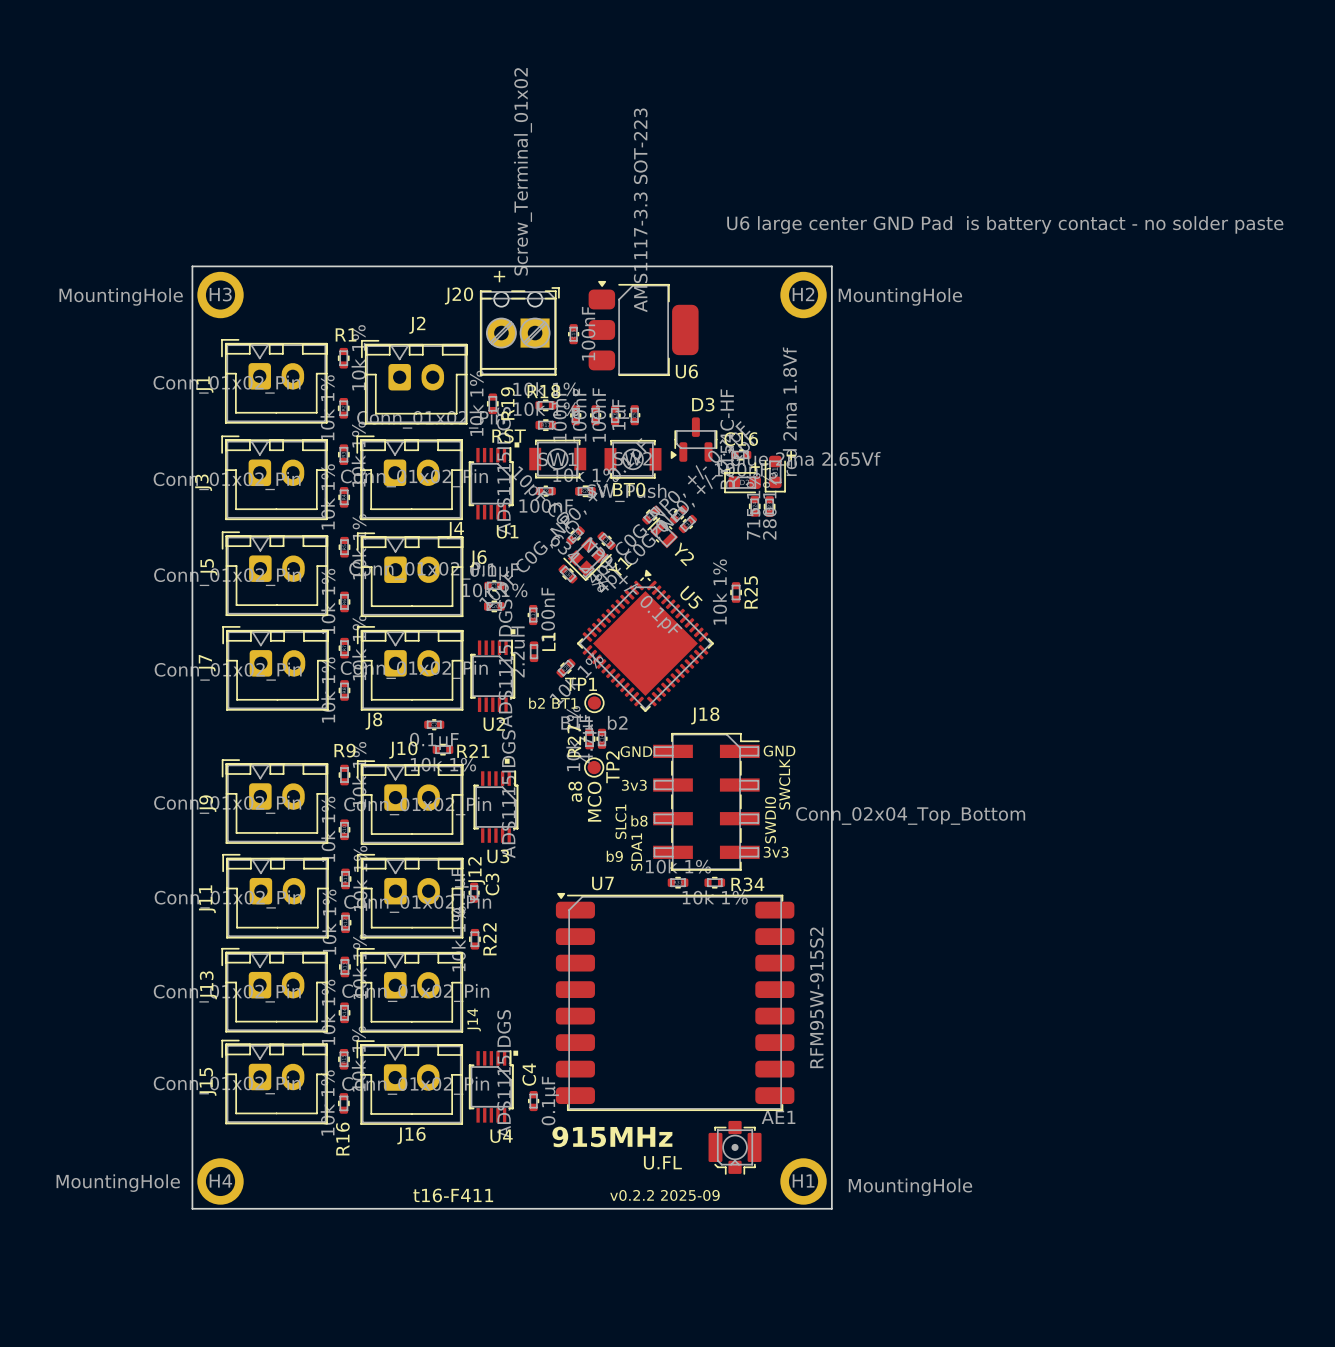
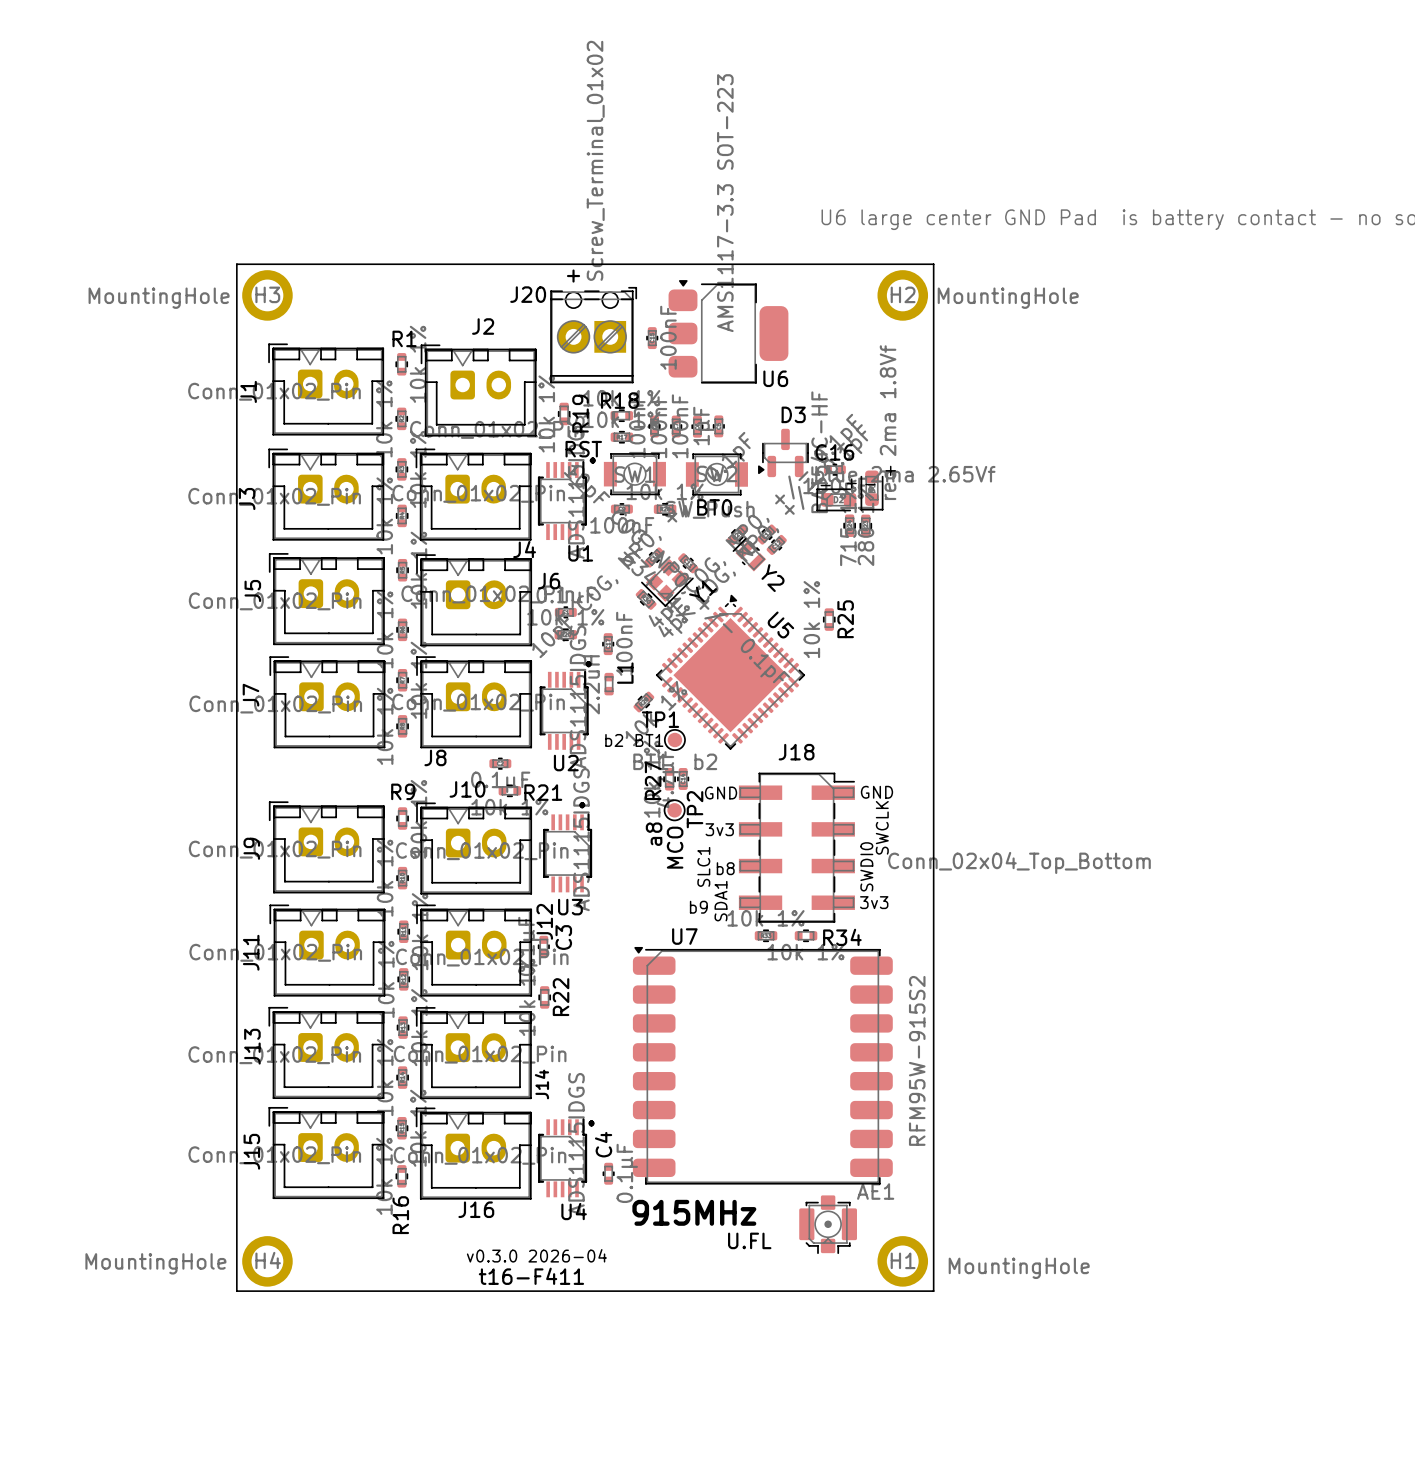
text: none -> v0.3.0 2026-04 (536, 1255)
text: v0.2.2 2025-09 (664, 1195) -> none

